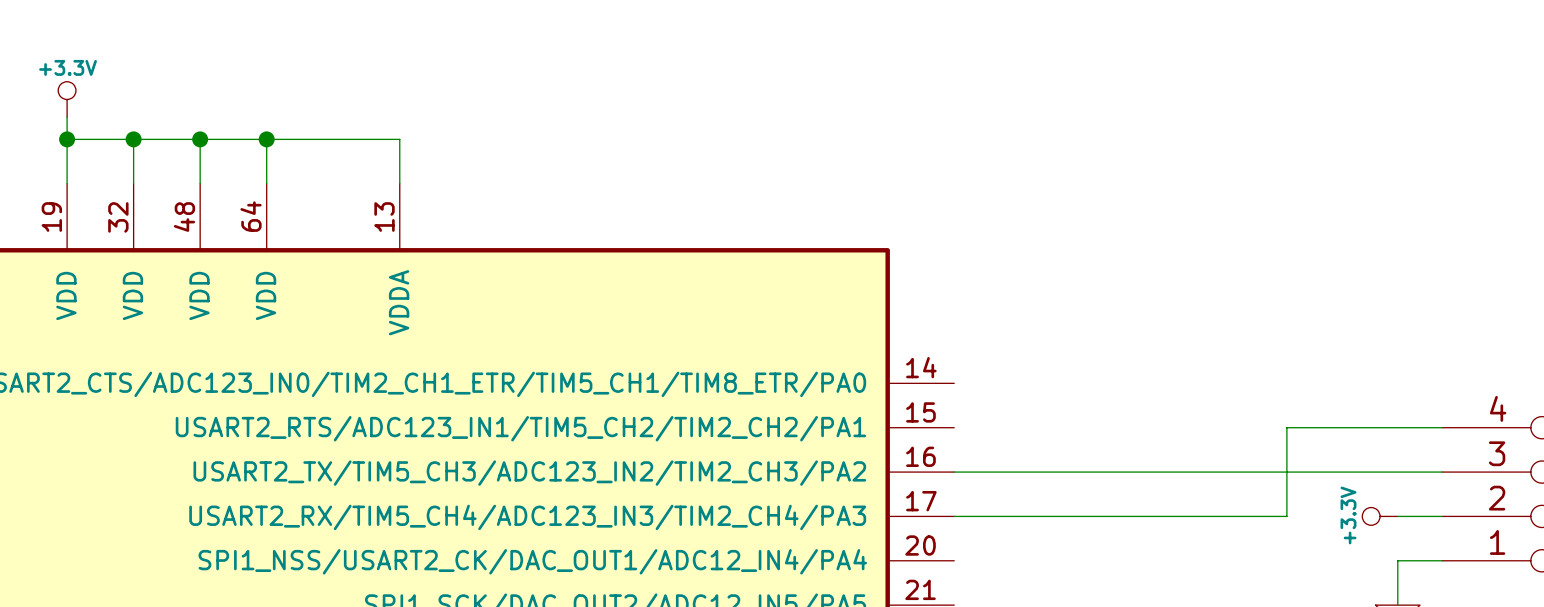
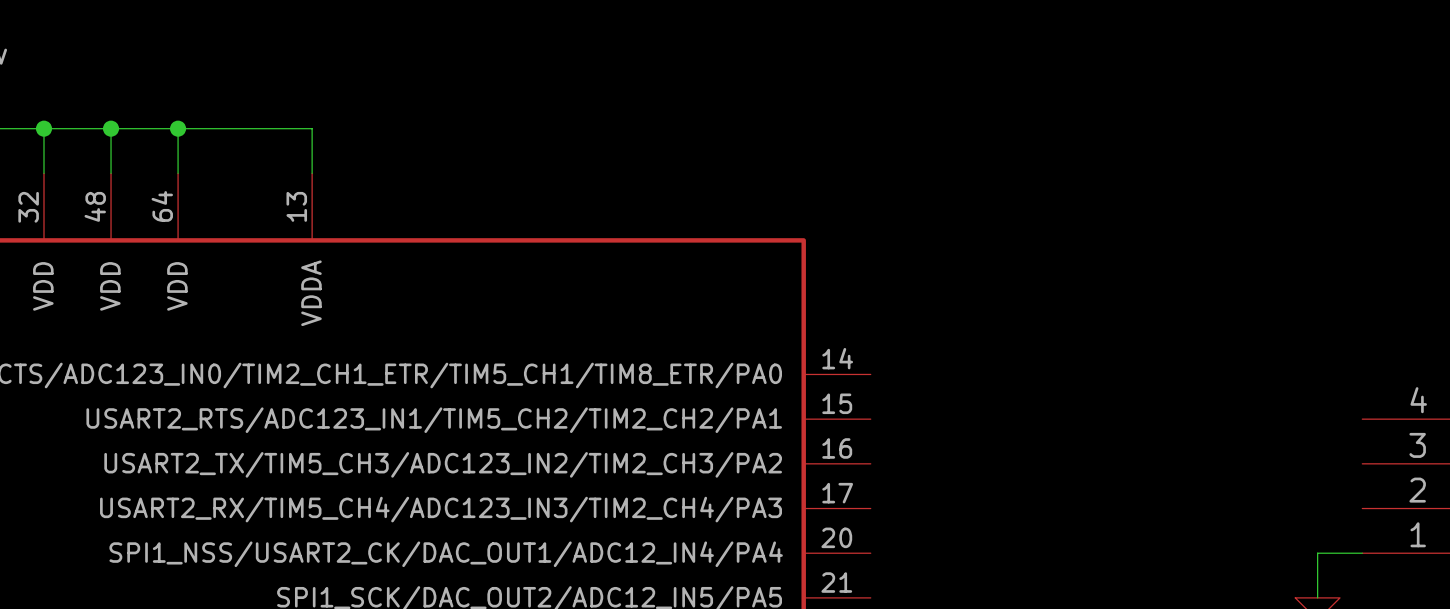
wire: (1442, 427) (1286, 427) (1286, 516) (954, 516) -> none
wire: (954, 472) (1442, 472) -> none
power symbol: +3.3V (1380, 516) -> none
wire: (1397, 516) (1442, 516) -> none

